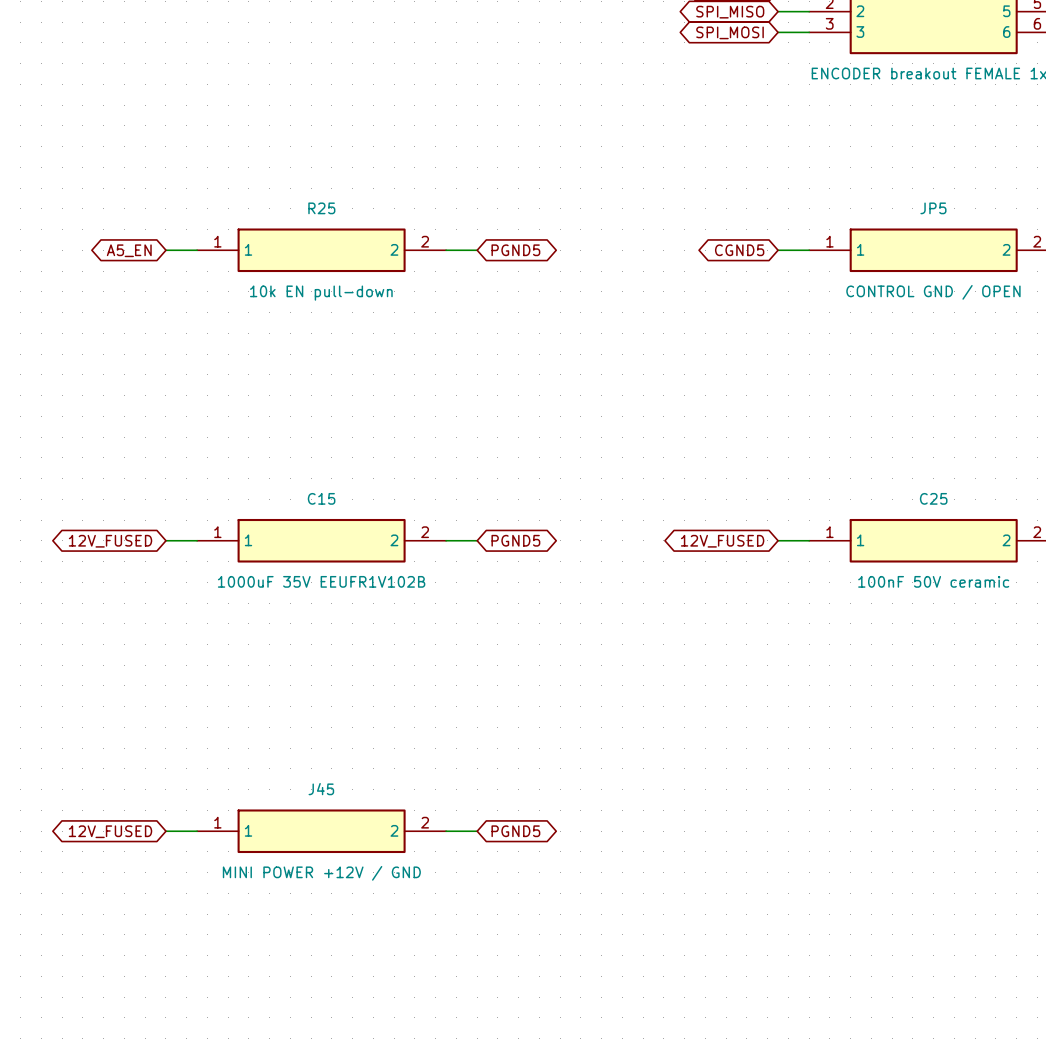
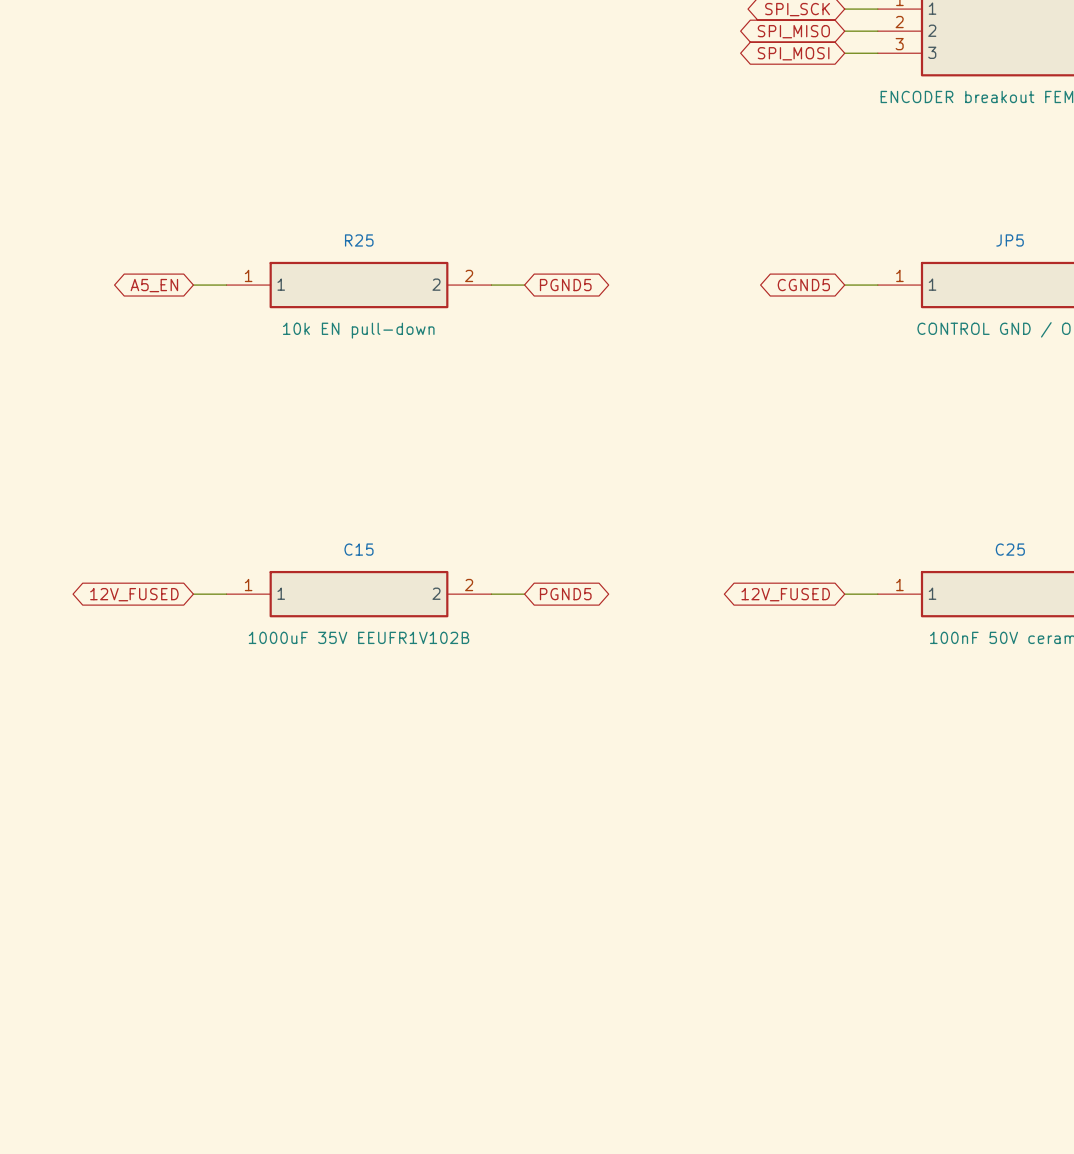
global label: 12V_FUSED (110, 831) -> none
wire: (165, 831) (197, 831) -> none
J45: MINI POWER +12V / GND (321, 831) -> none
wire: (446, 831) (477, 831) -> none
global label: PGND5 (515, 831) -> none

